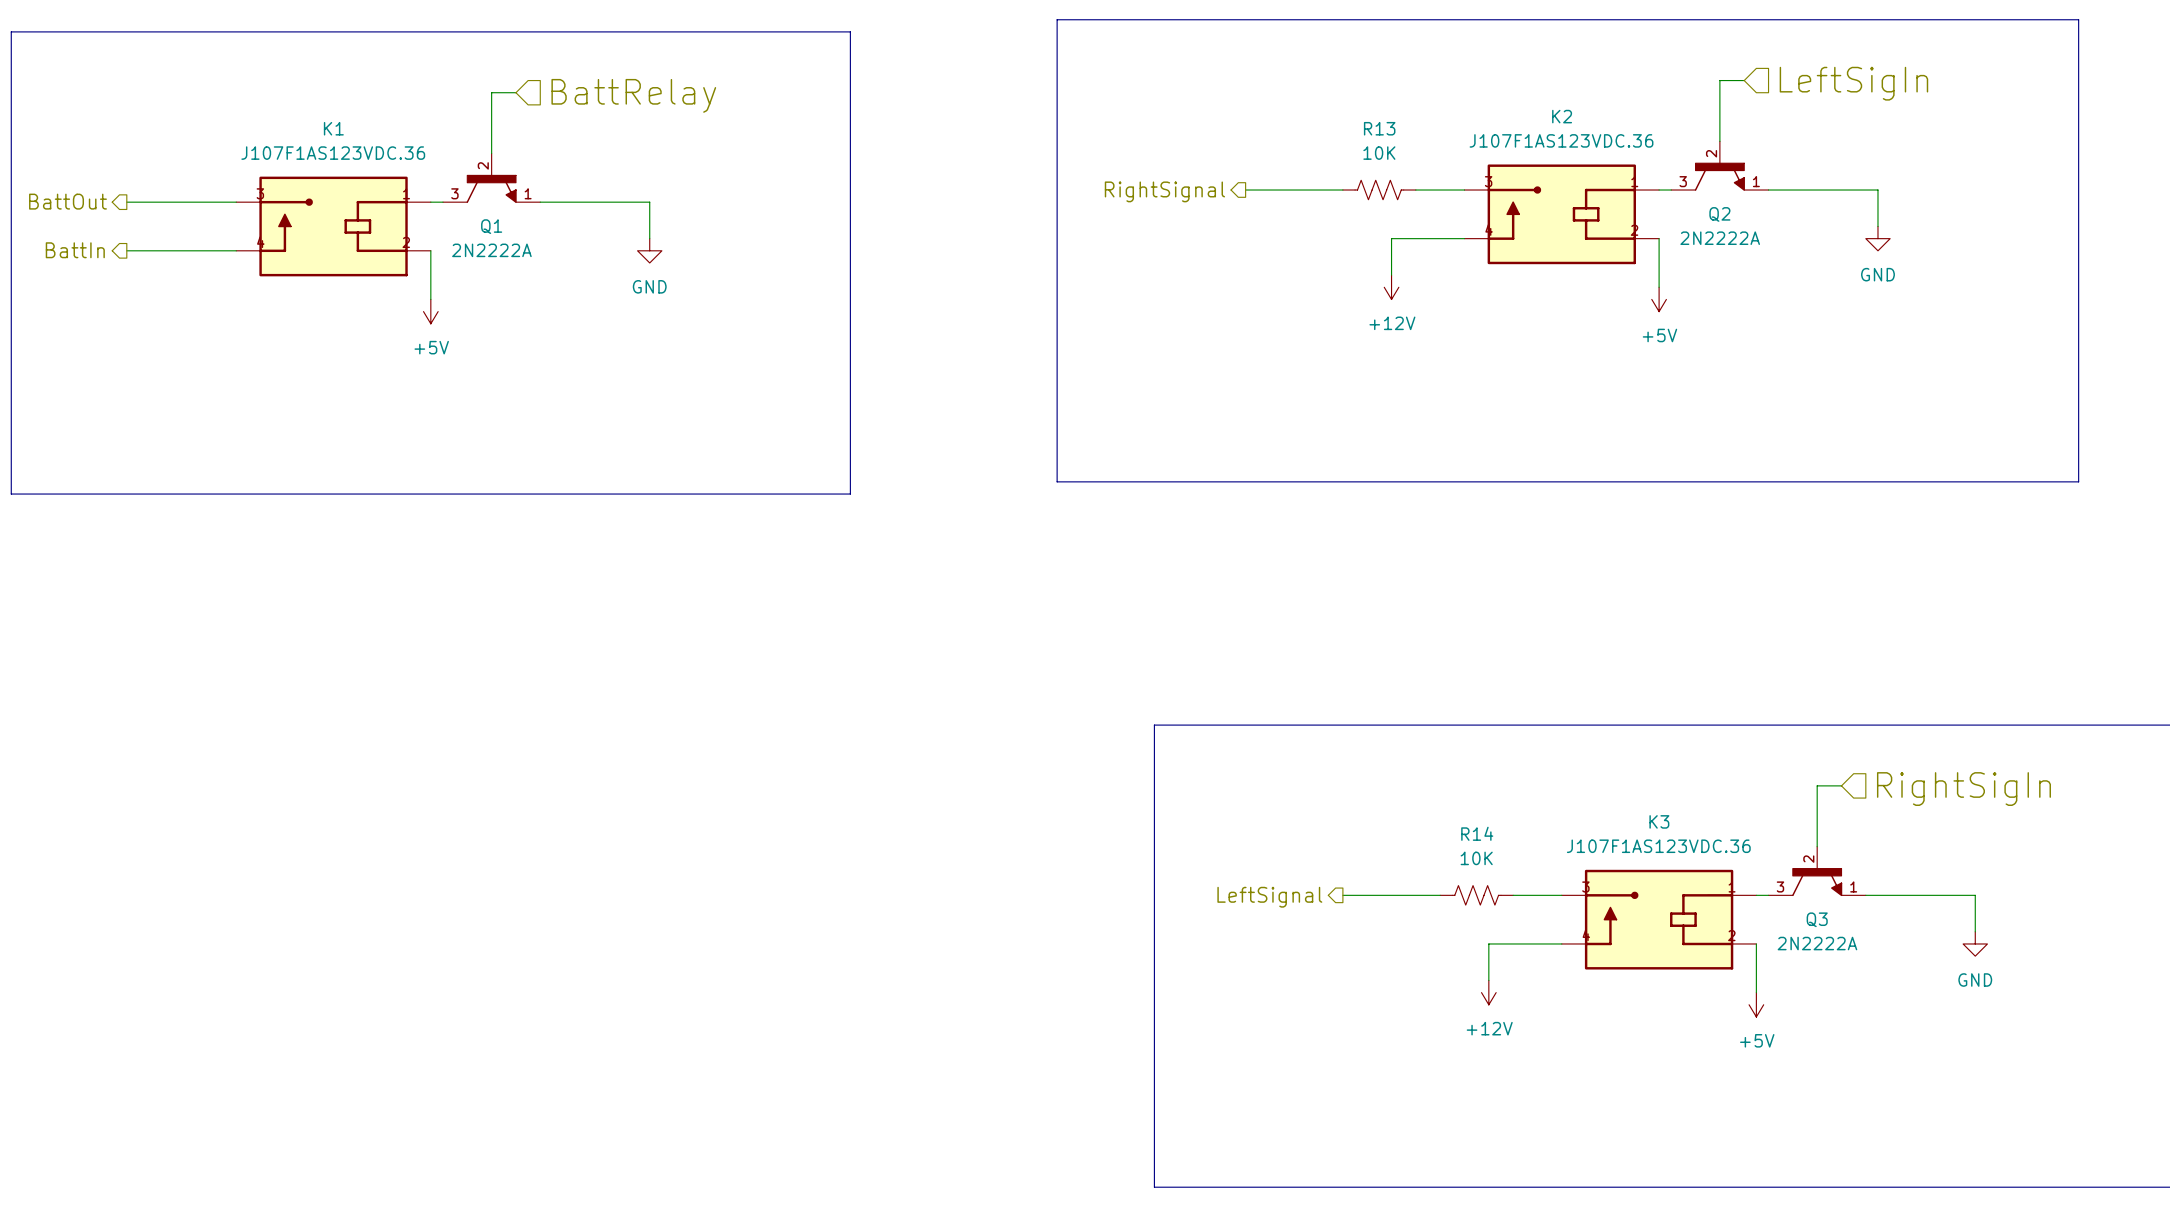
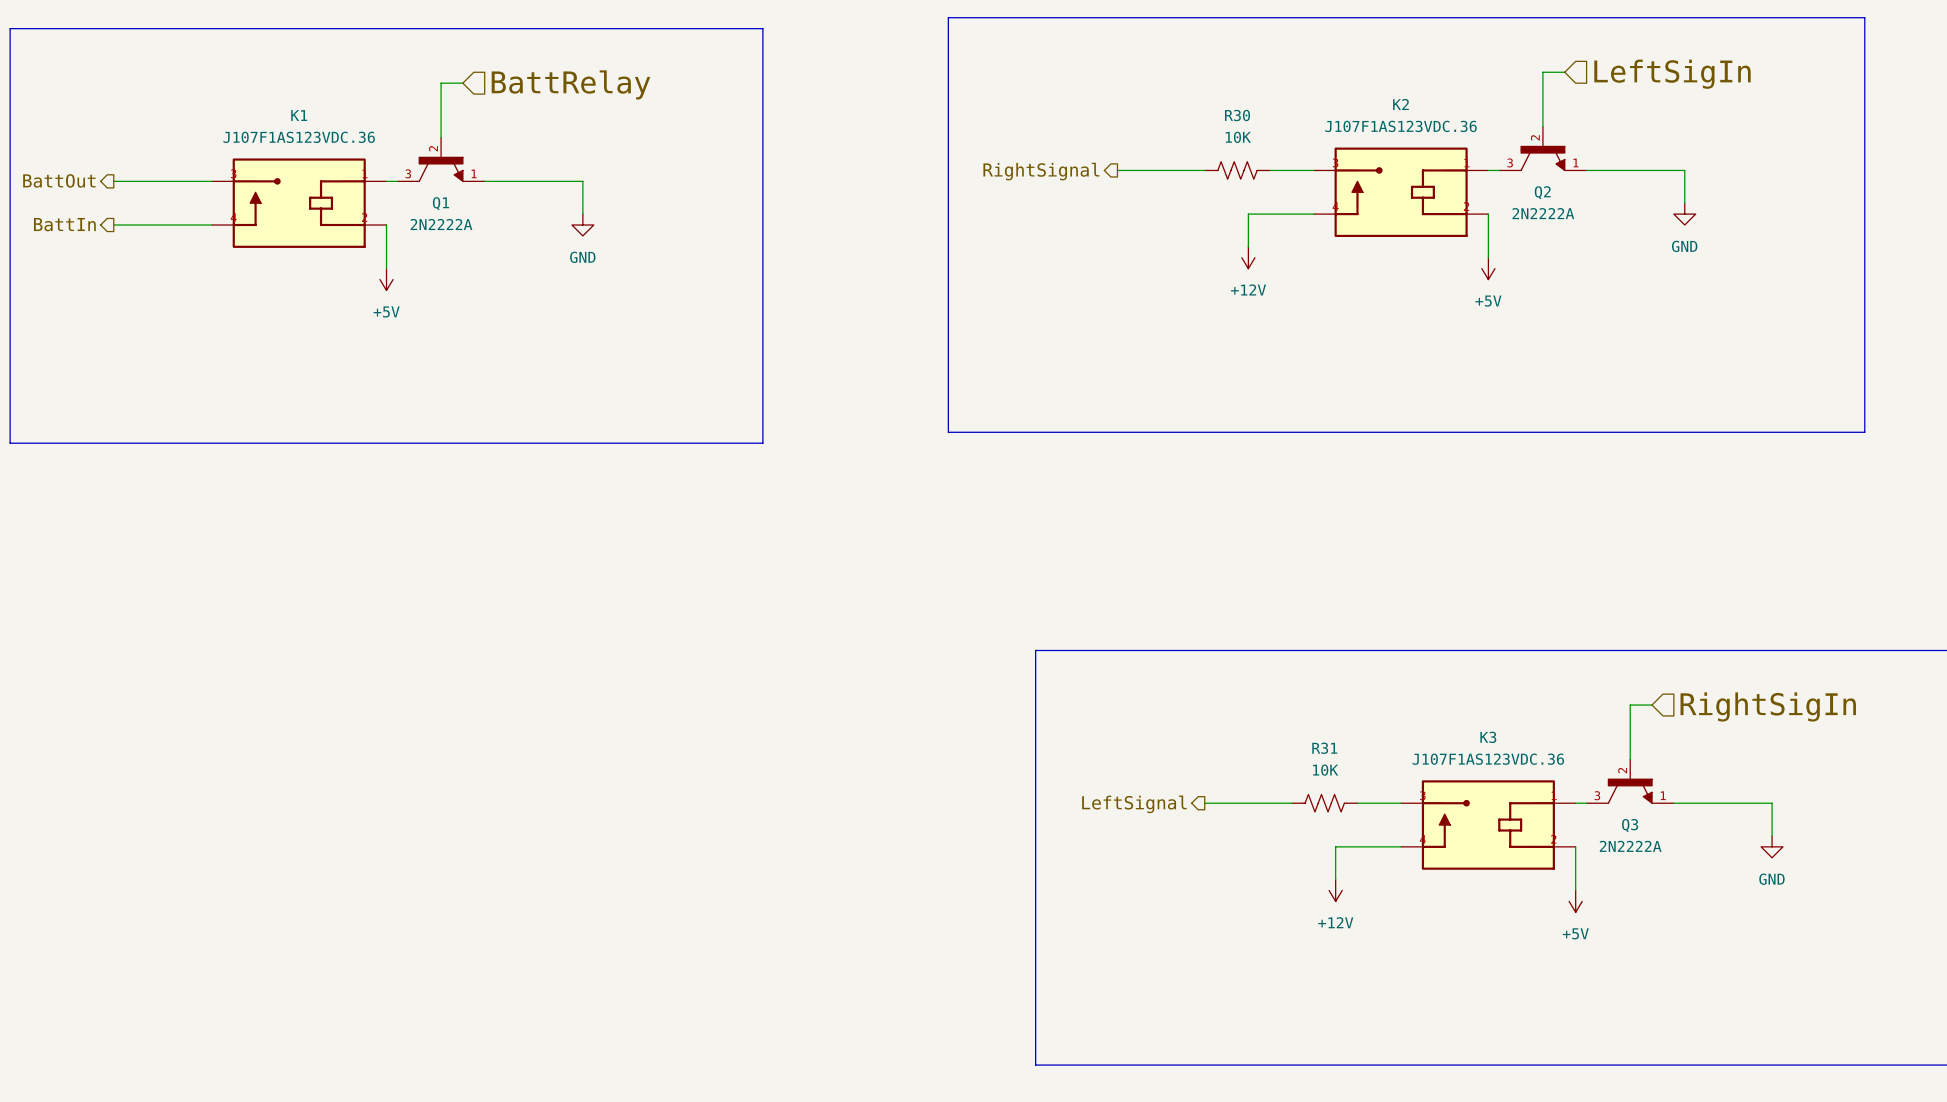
R13 name: R13 (1379, 128) -> R30 (1237, 115)
R14 name: R14 (1477, 833) -> R31 (1324, 748)

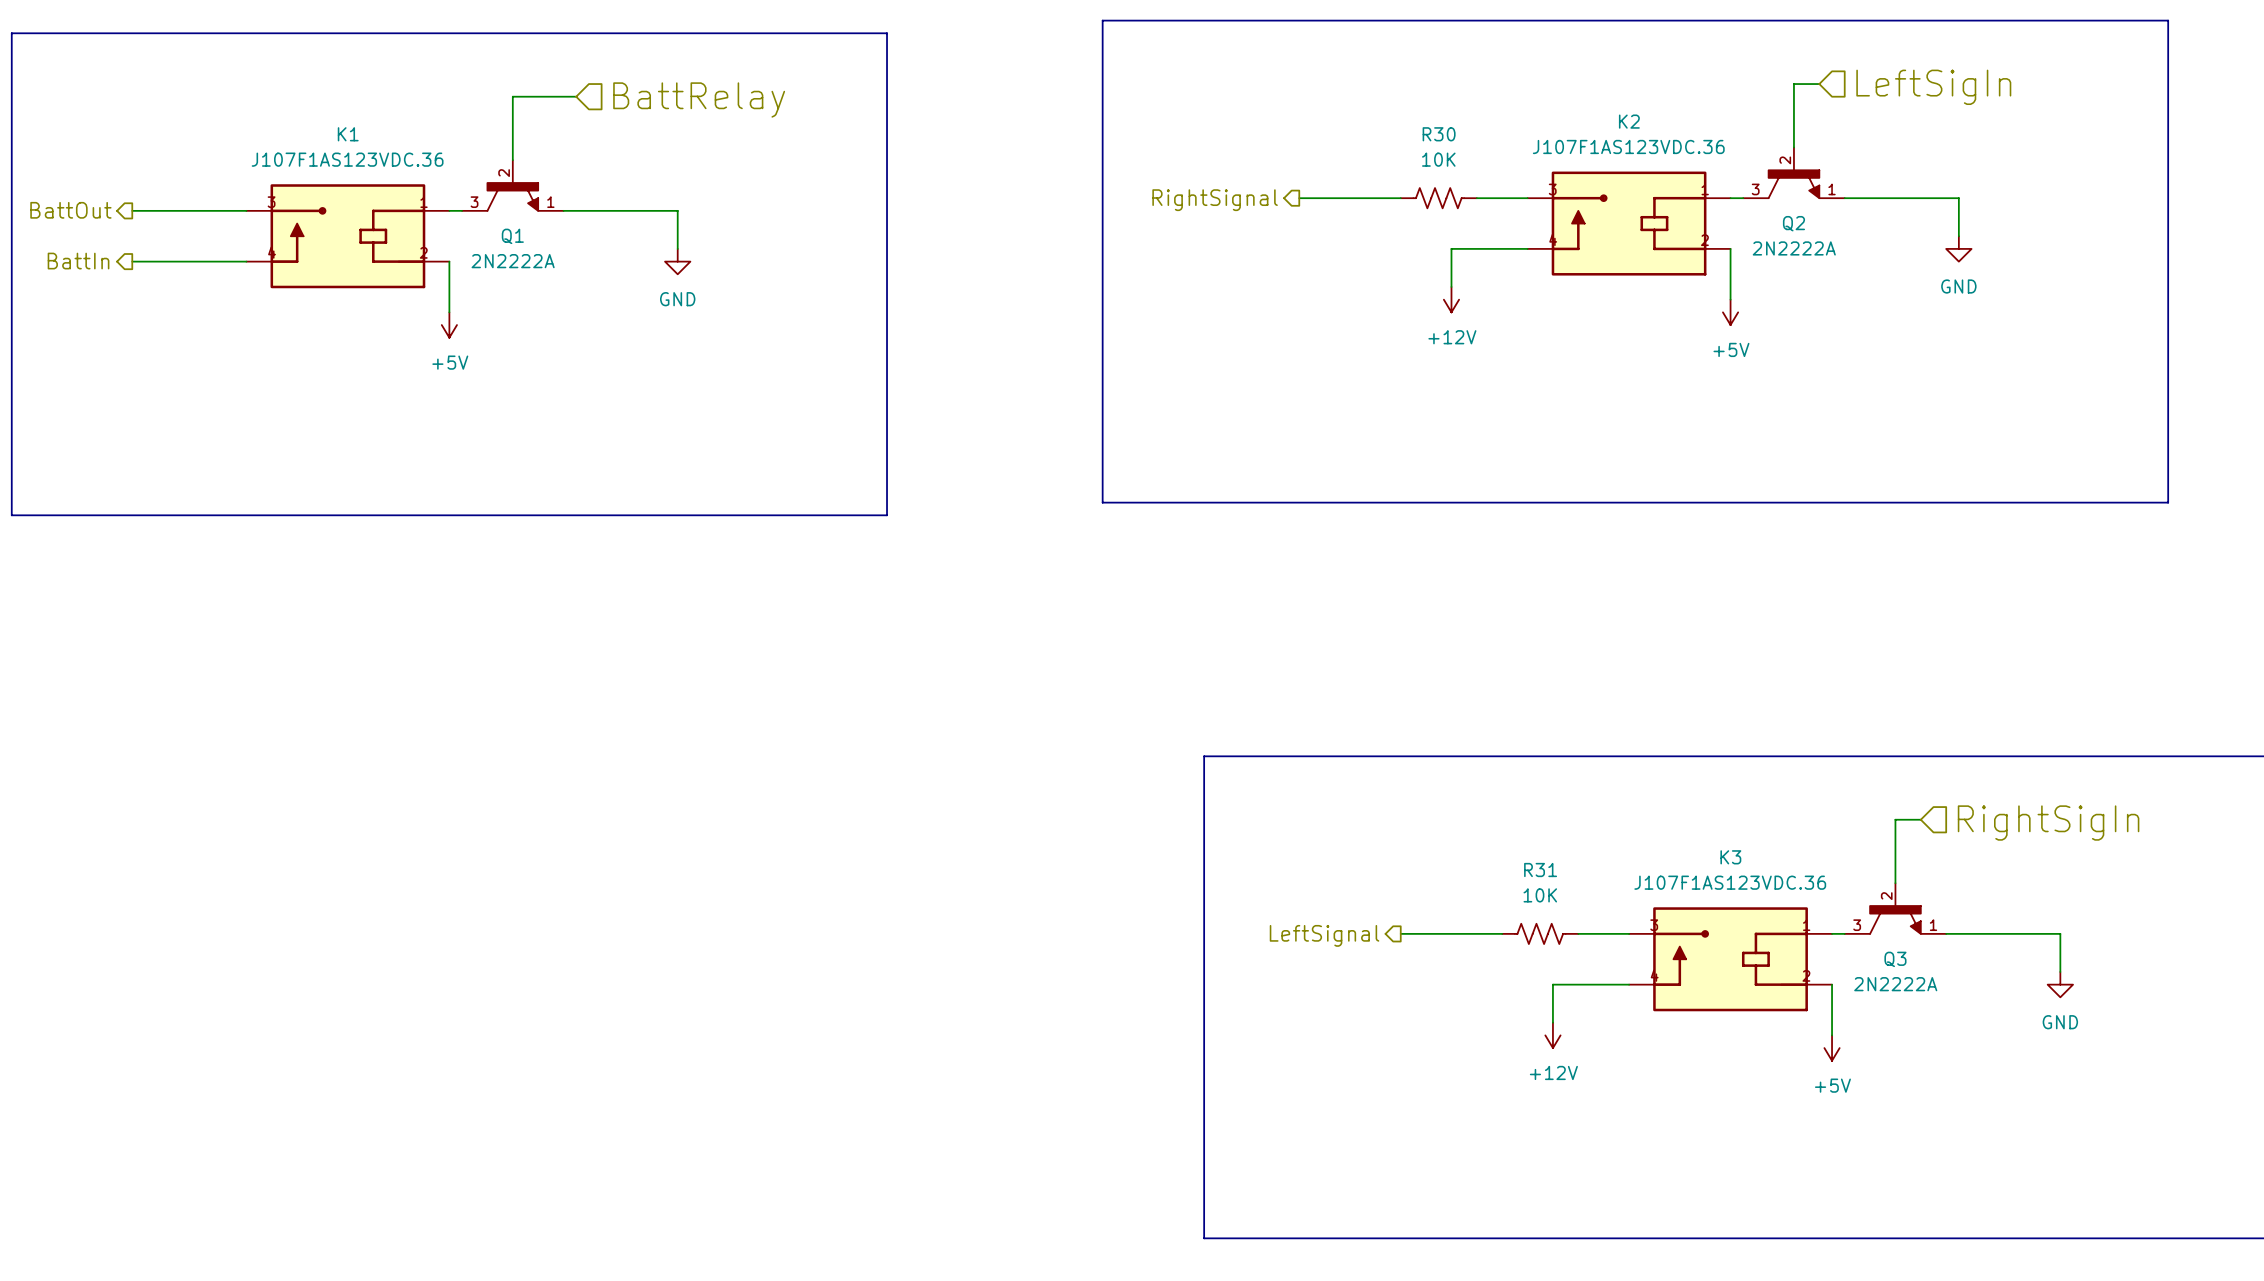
wire: none -> (538, 96) (576, 96)
hierarchical label position: BattRelay (570, 84) -> BattRelay (699, 99)

